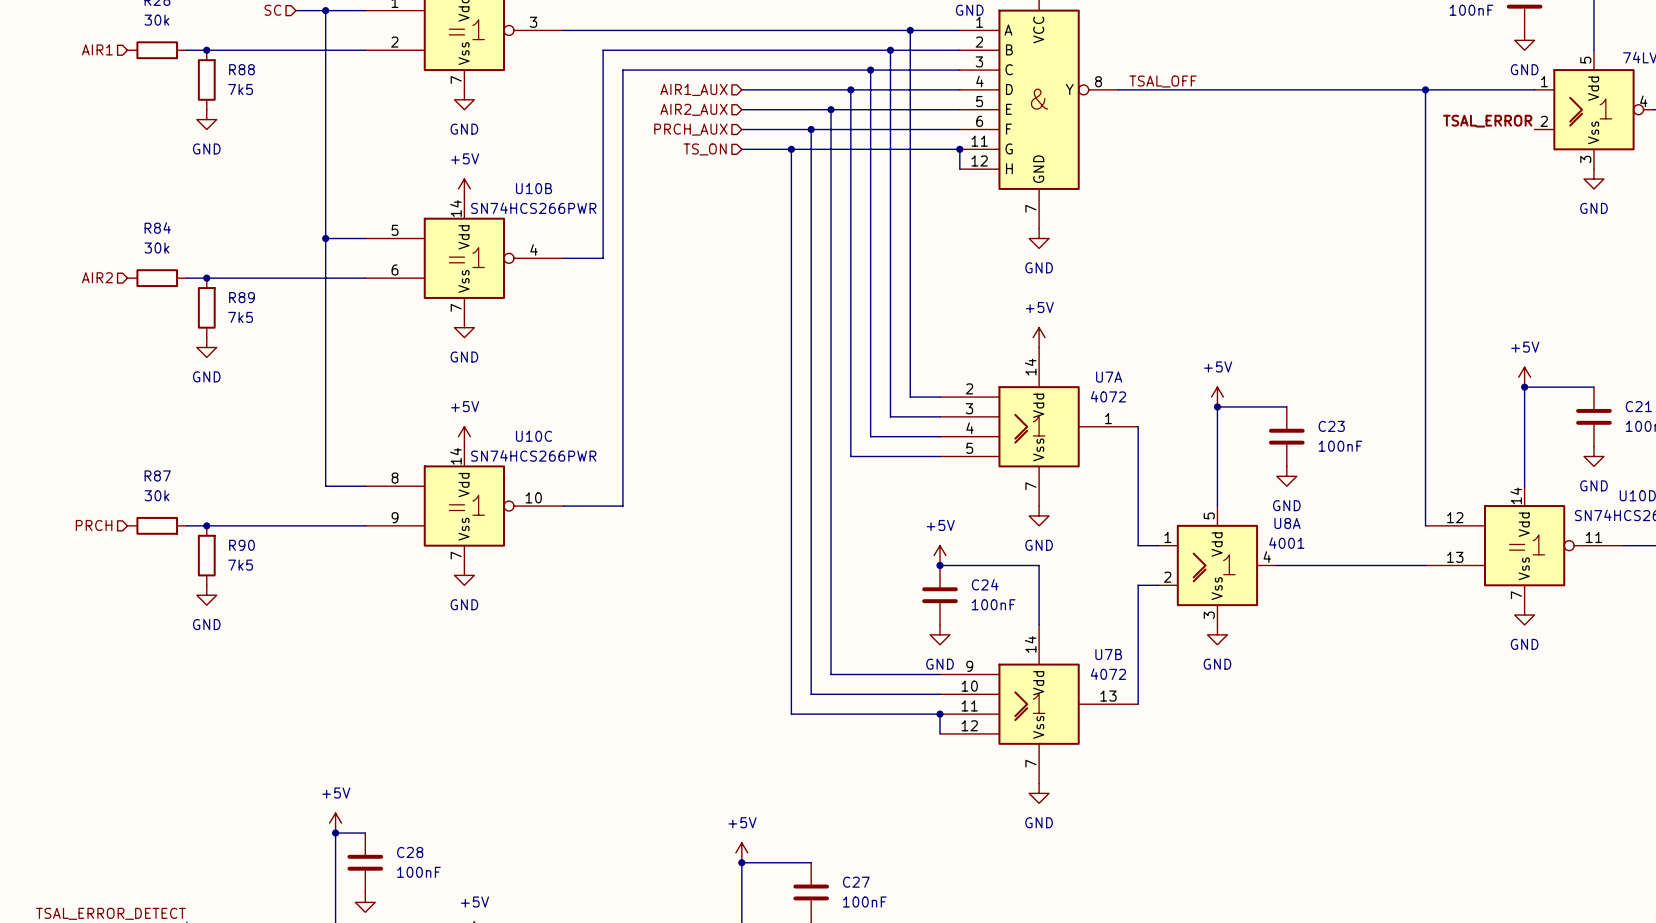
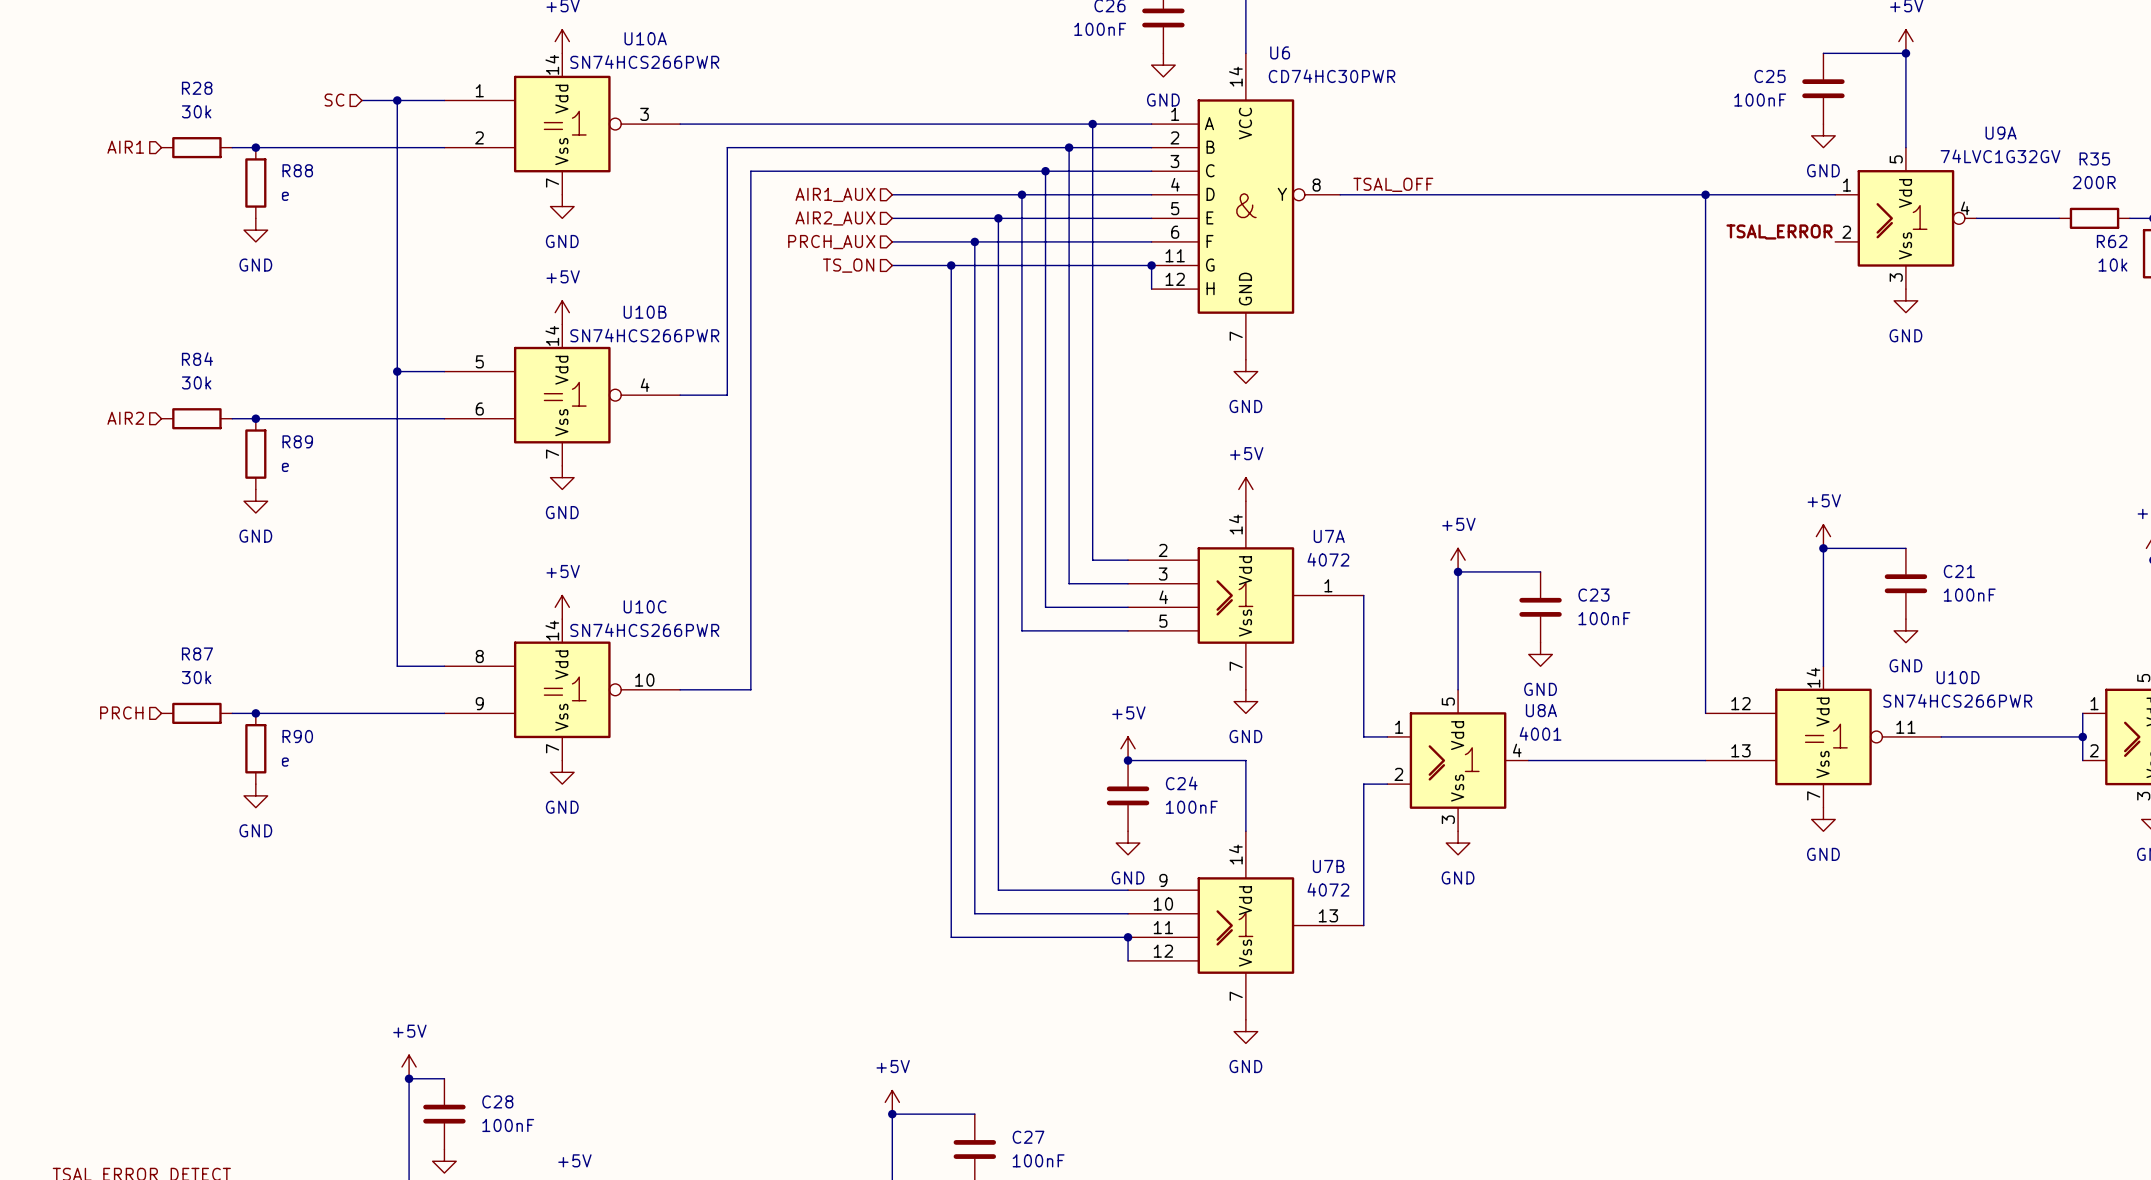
R88 value: 7k5 (240, 89) -> e (285, 196)
R89 value: 7k5 (240, 317) -> e (285, 467)
R90 value: 7k5 (240, 565) -> e (285, 762)

